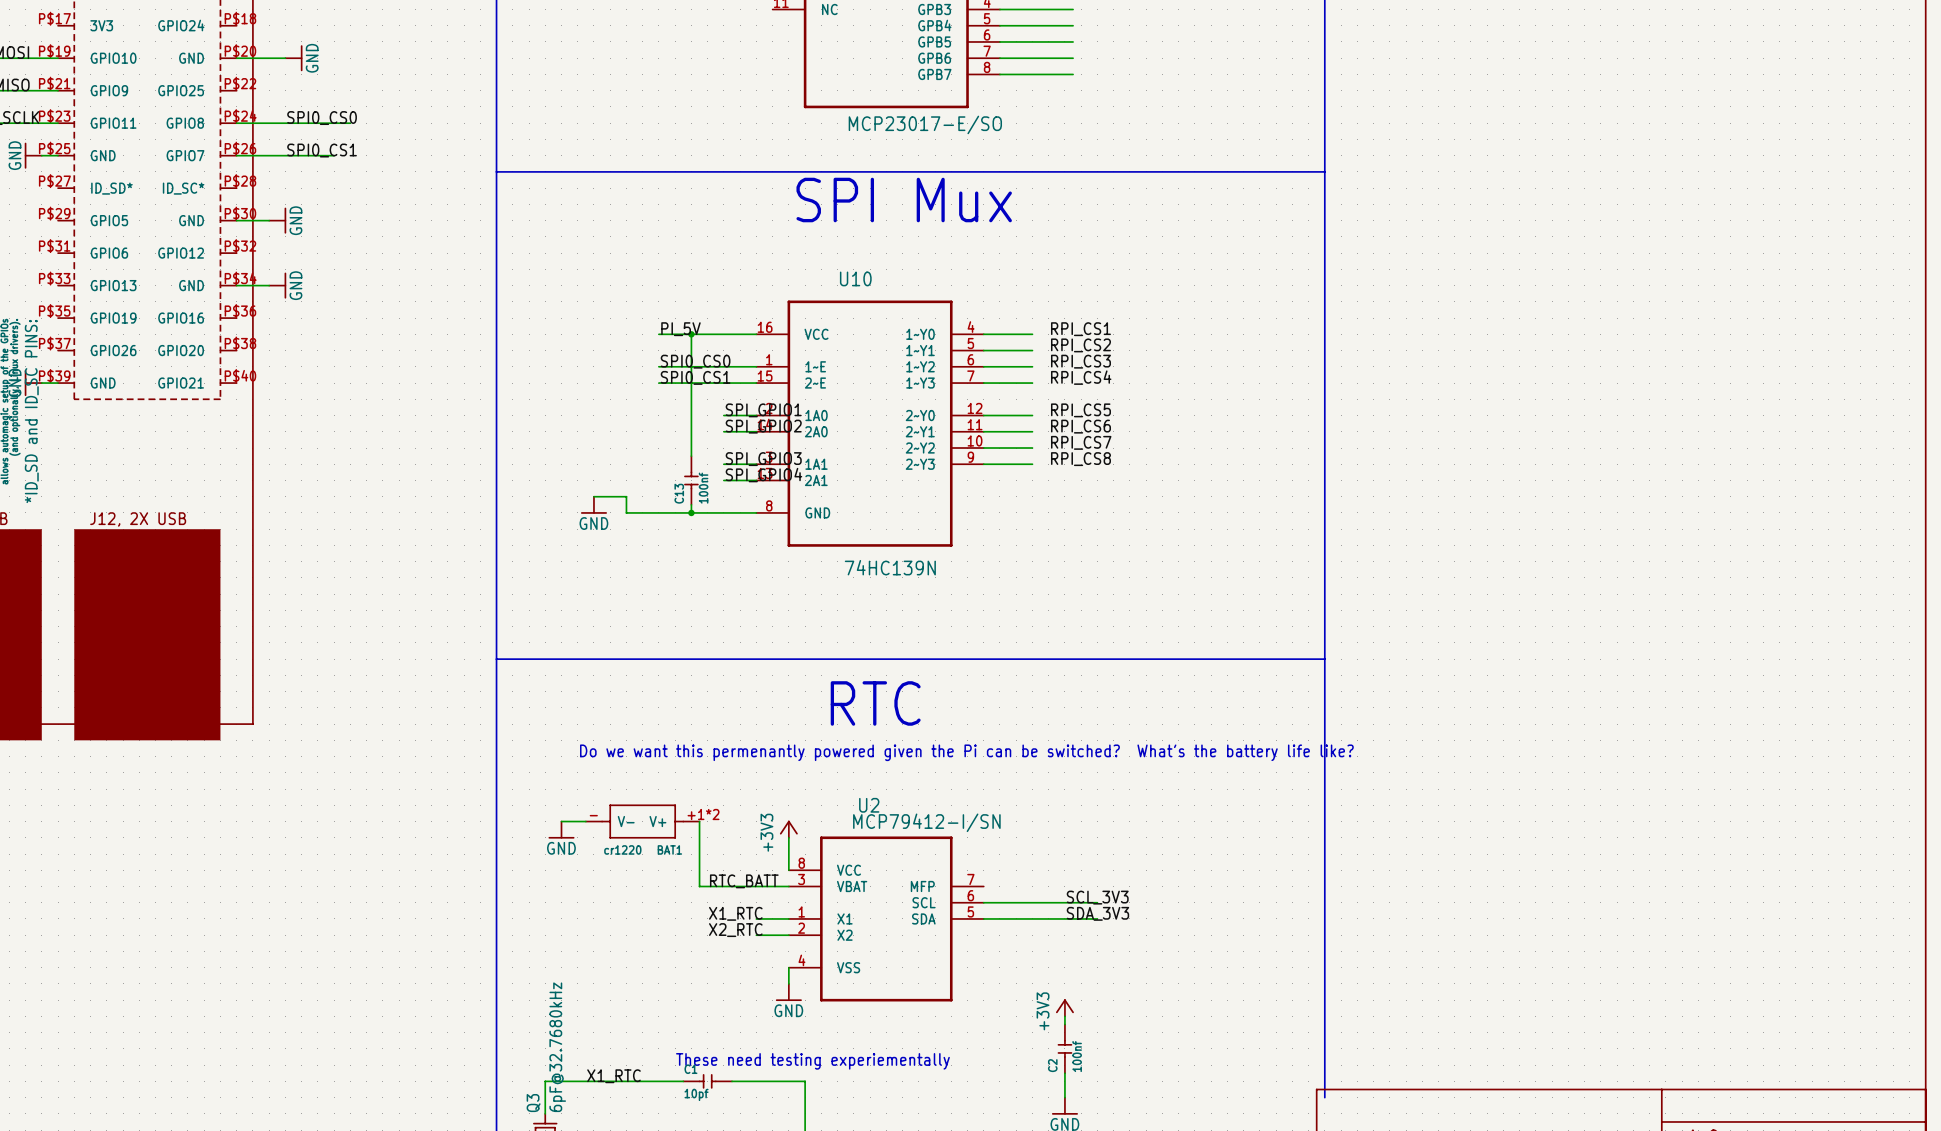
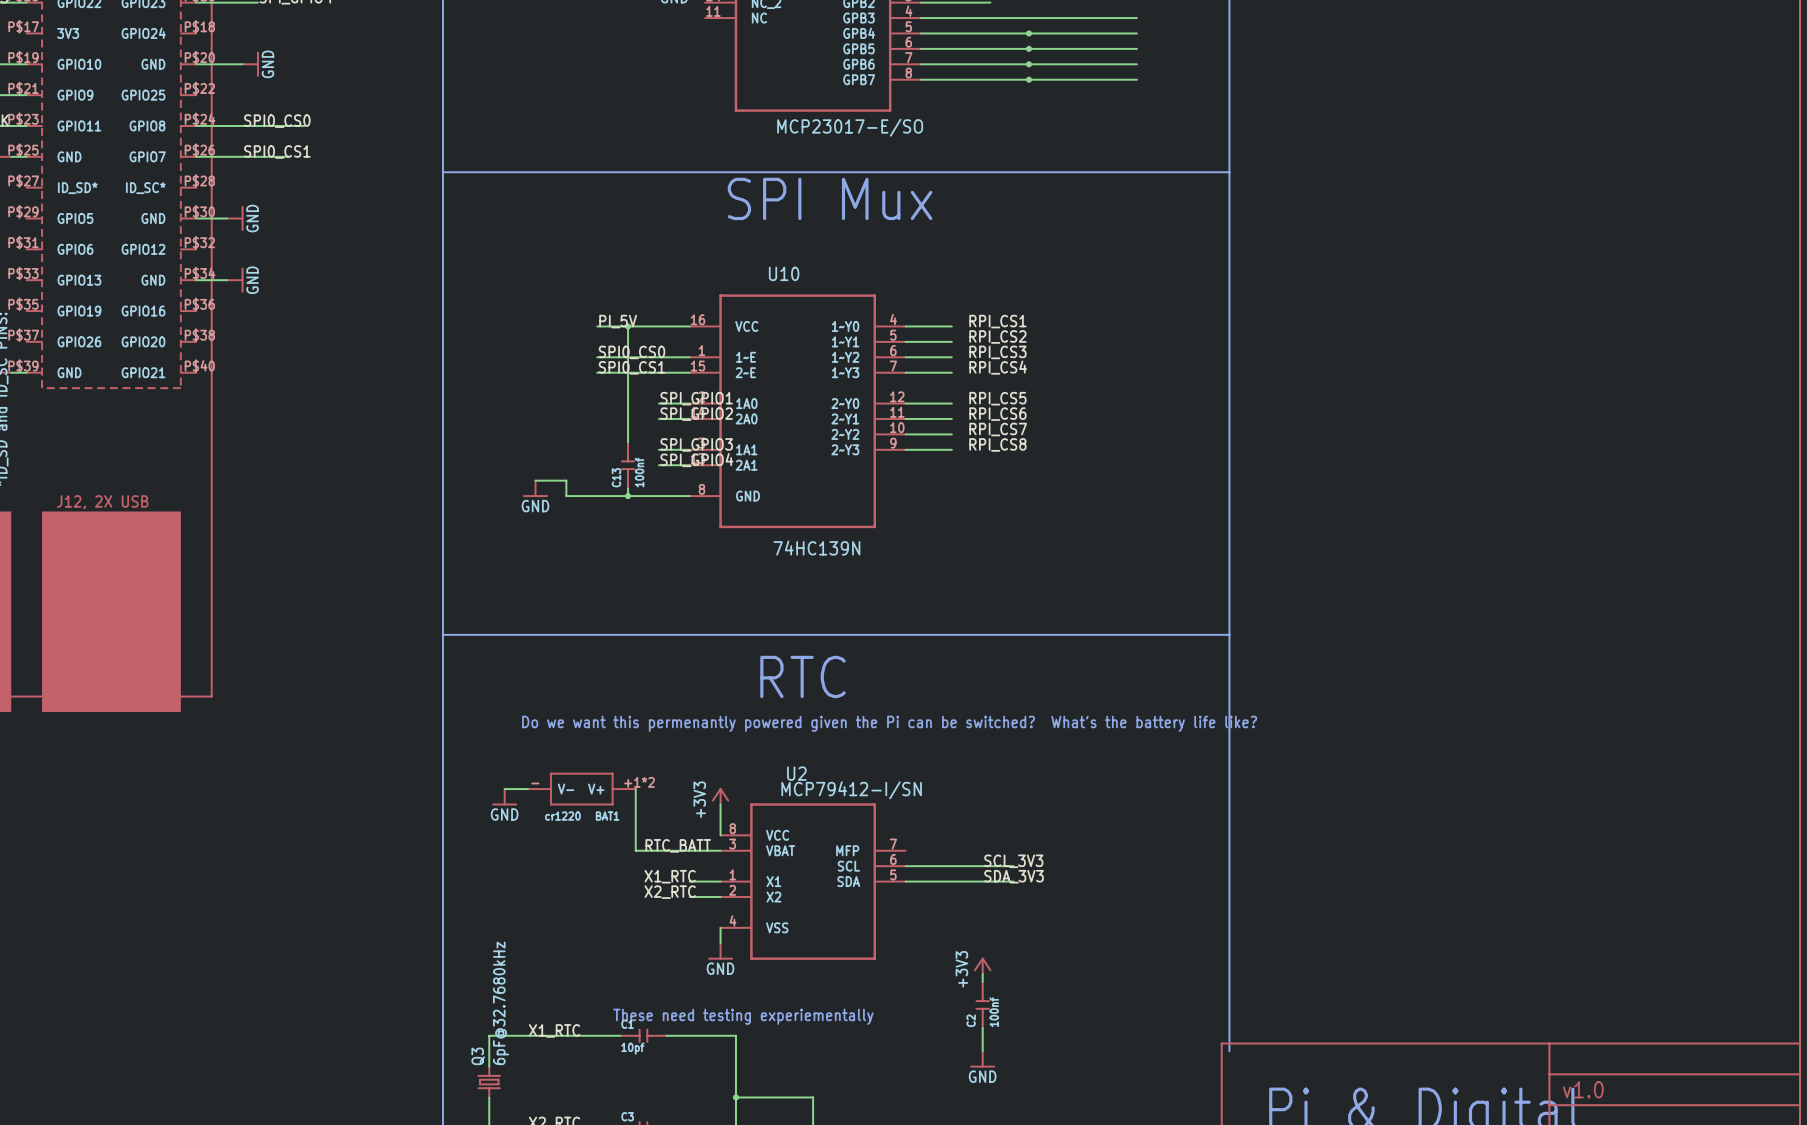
wire: none -> (990, 18) (1136, 18)
wire: none -> (990, 33) (1136, 33)
junction: none -> (1028, 33)
wire: none -> (990, 48) (1136, 48)
junction: none -> (1028, 48)
wire: none -> (990, 64) (1136, 64)
junction: none -> (1028, 64)
wire: none -> (990, 79) (1136, 79)
junction: none -> (1028, 79)

